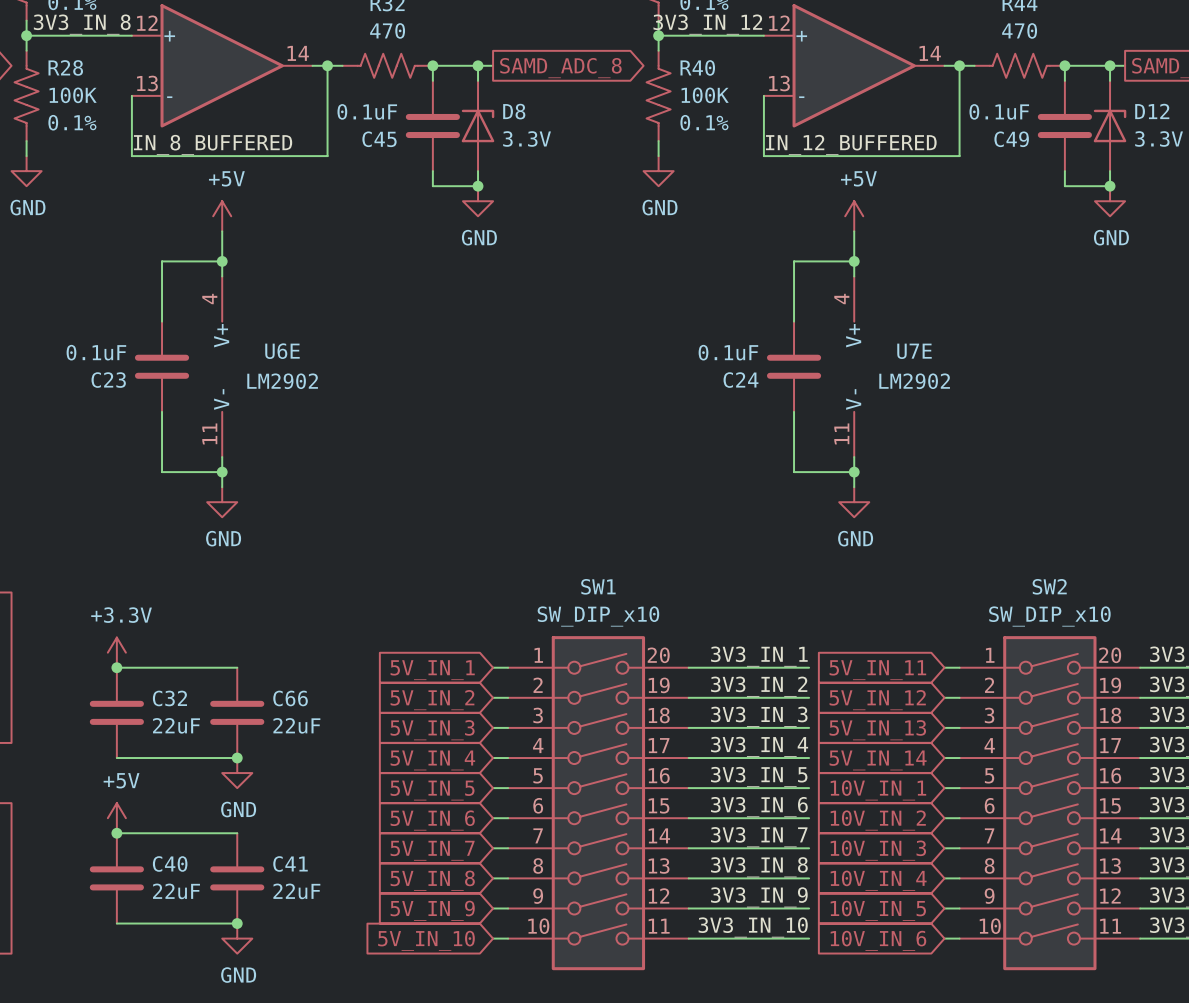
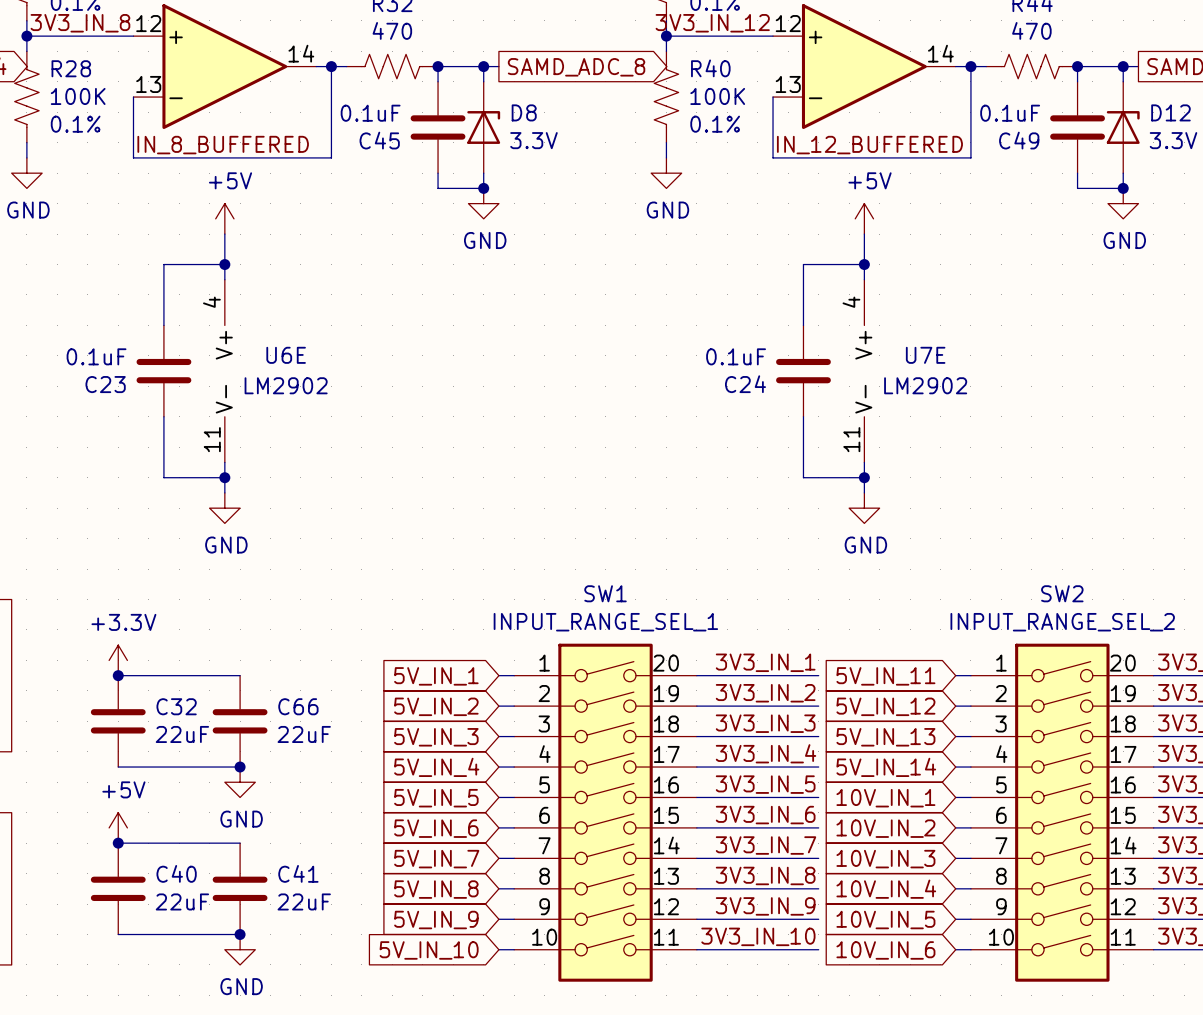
SW1 value: SW_DIP_x10 (598, 616) -> INPUT_RANGE_SEL_1 (605, 622)
SW2 value: SW_DIP_x10 (1049, 616) -> INPUT_RANGE_SEL_2 (1062, 622)

